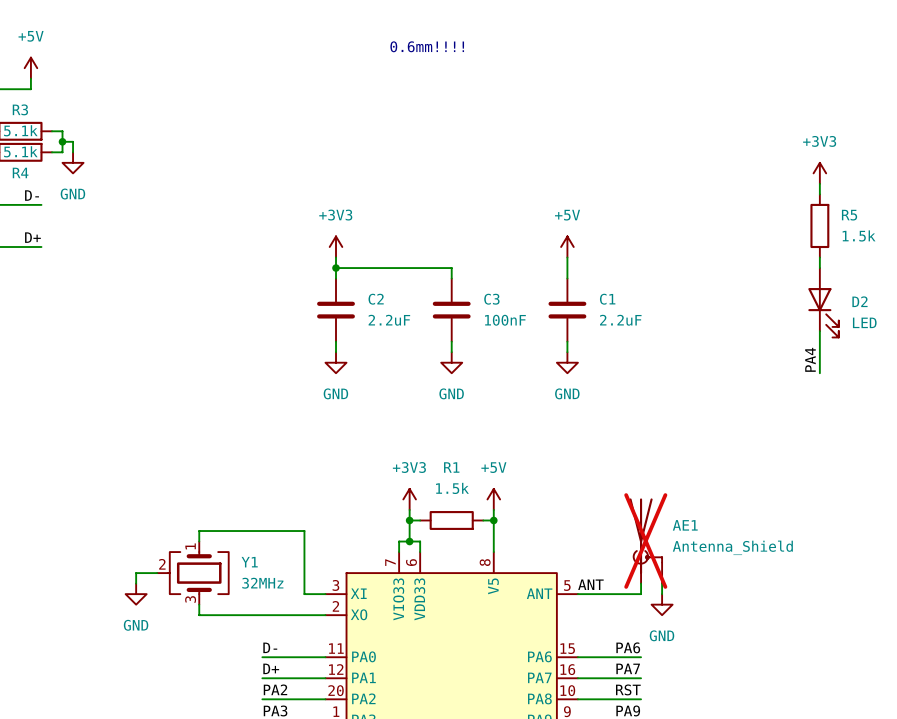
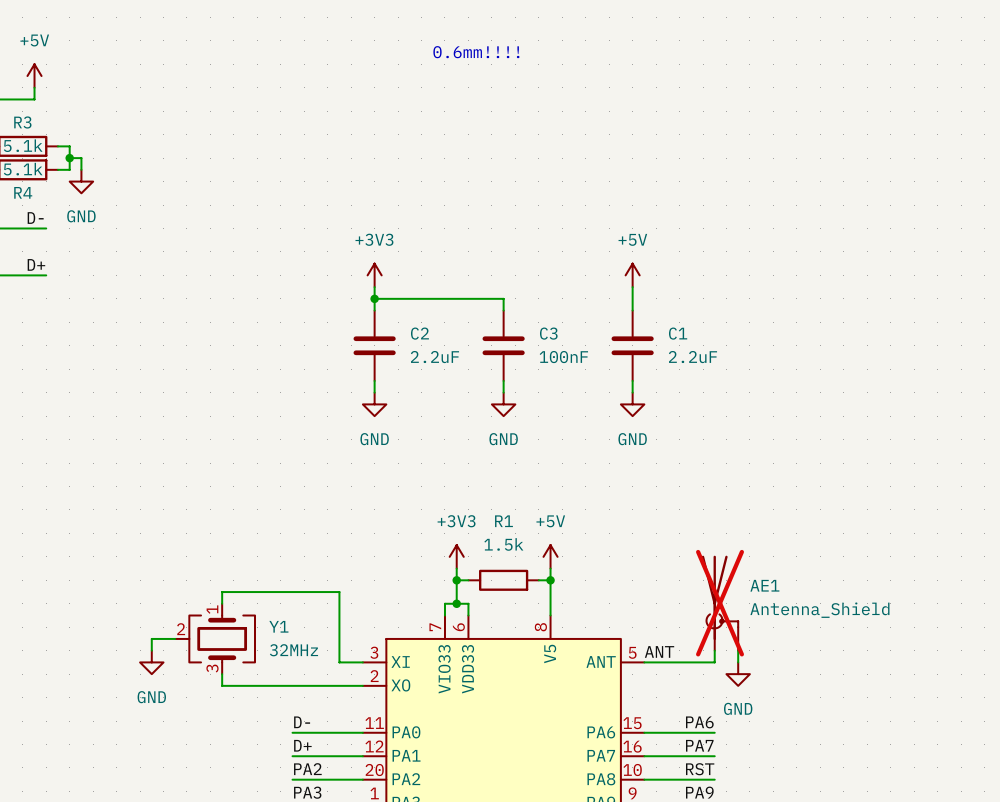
power symbol: +3V3 (819, 173) -> none
wire: (819, 183) (819, 194) -> none
R5: 1.5k (819, 225) -> none
wire: (819, 257) (819, 268) -> none
D2: LED (823, 302) -> none
wire: (819, 331) (819, 373) -> none
label: PA4 (810, 359) -> none

